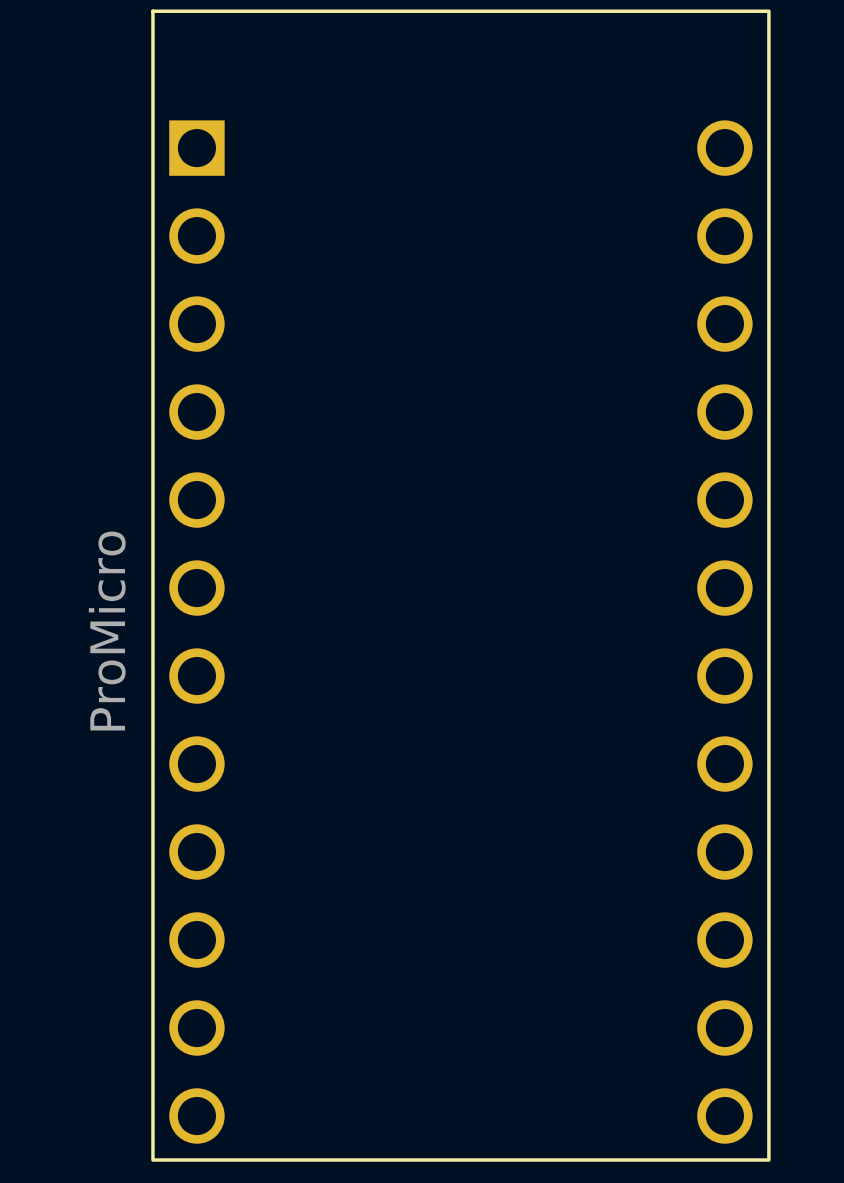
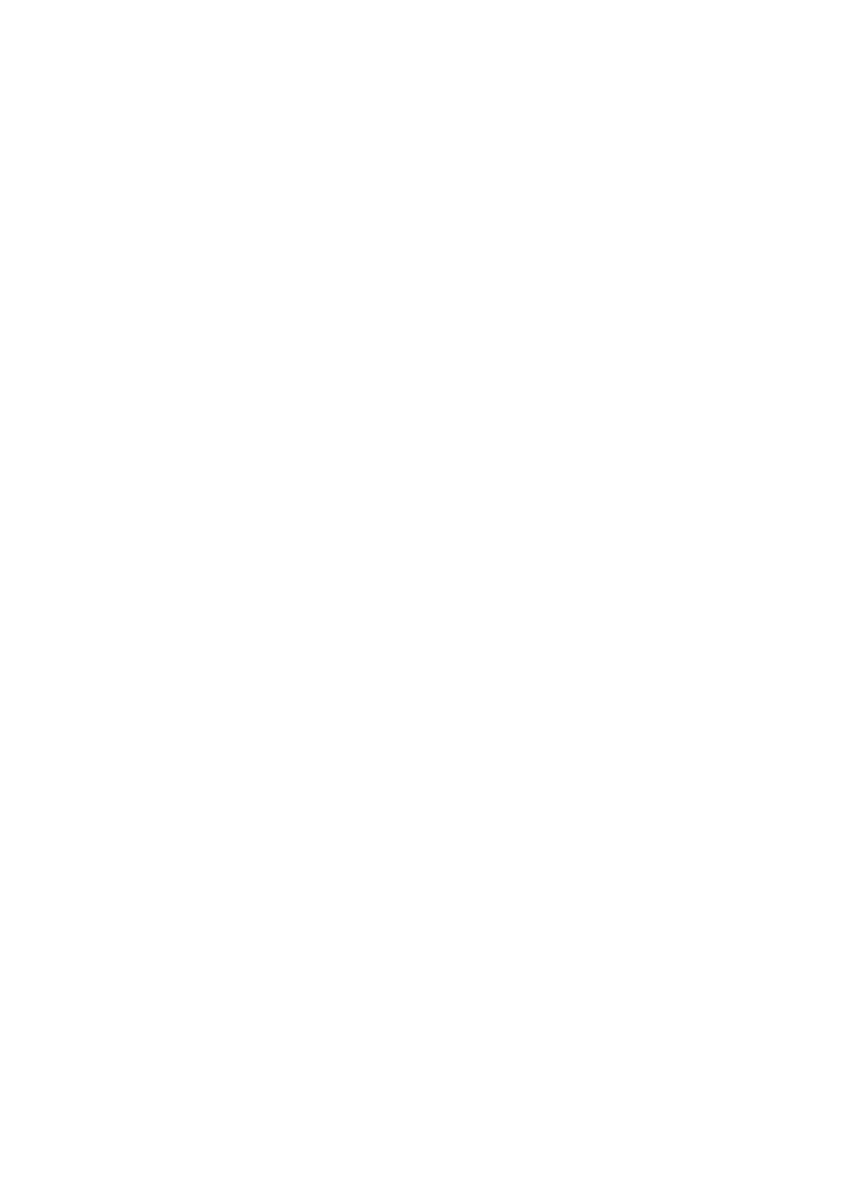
part: ProMicro (460, 585) -> none

